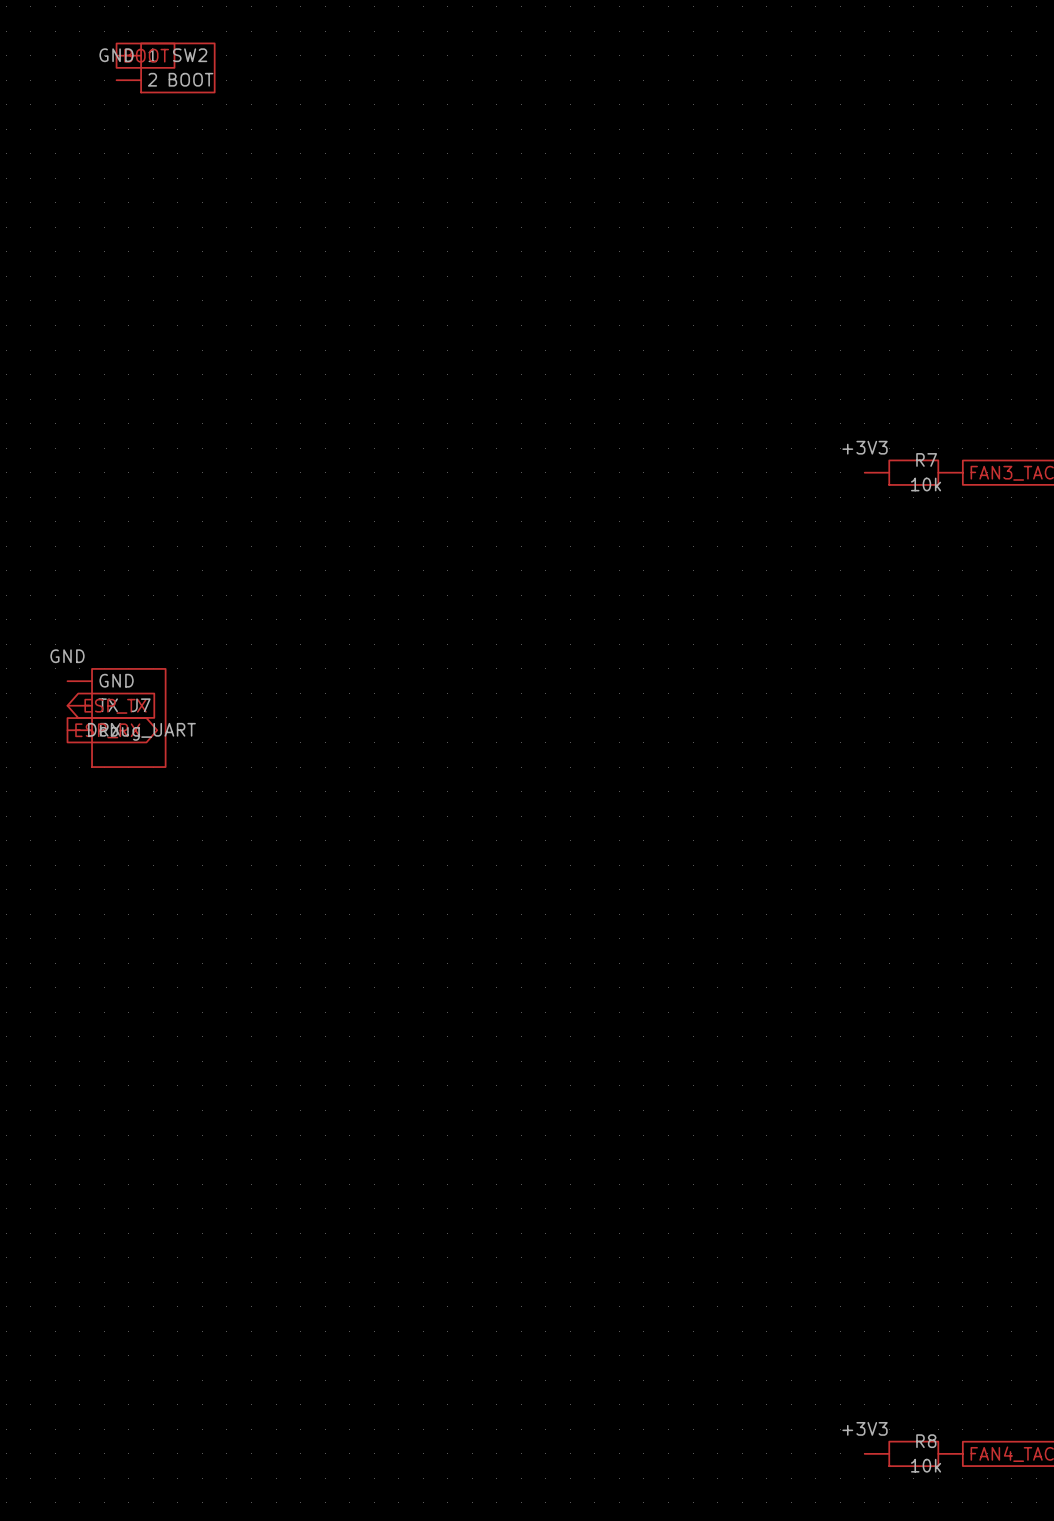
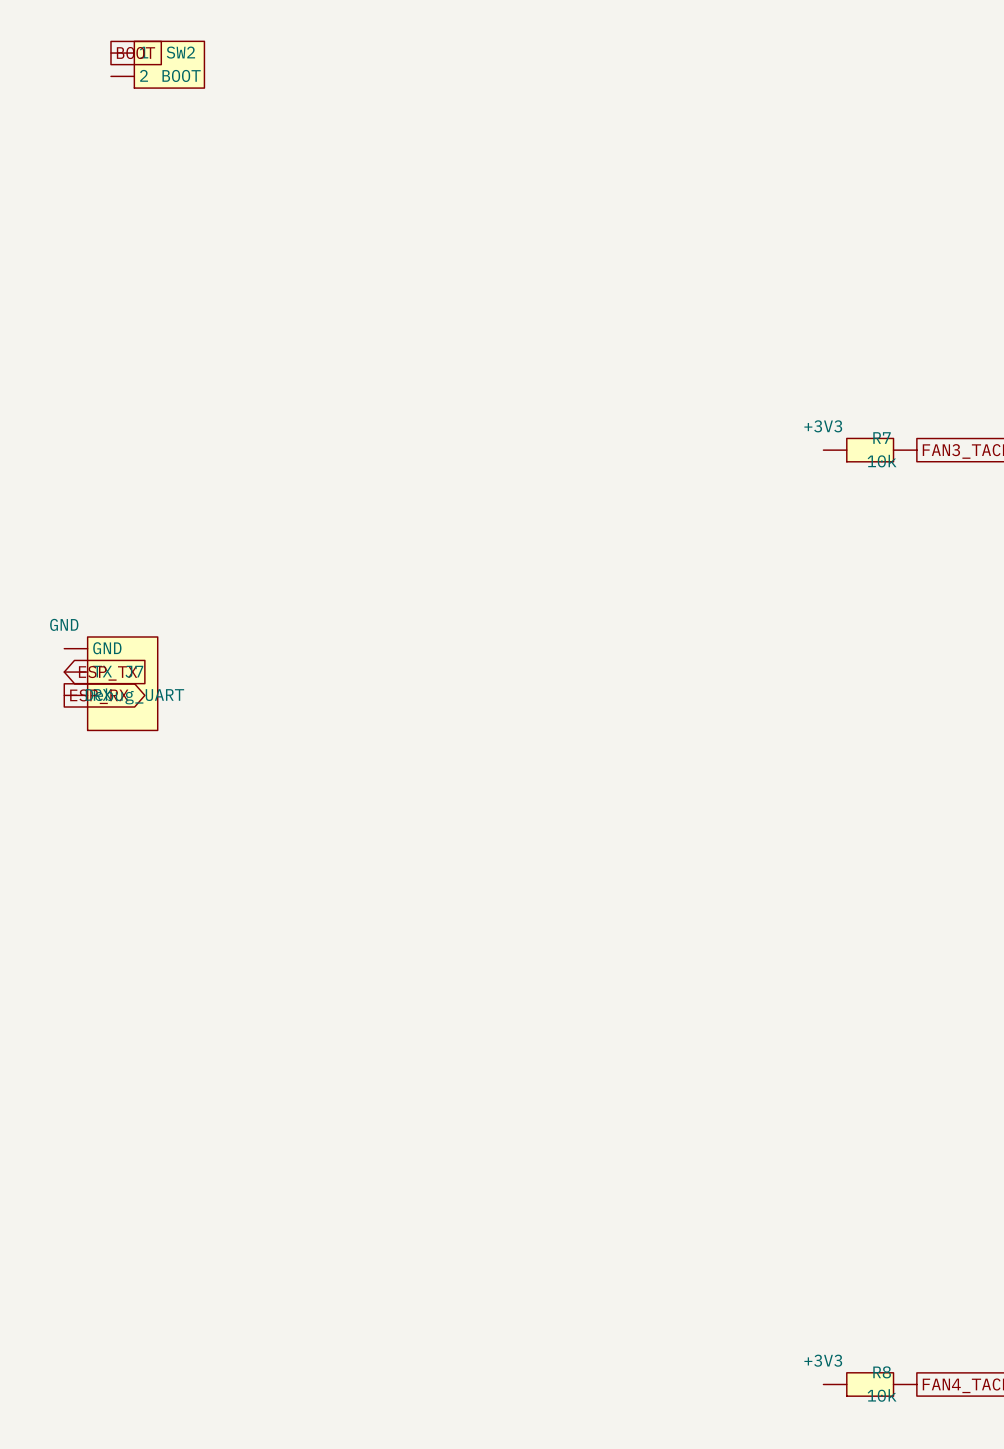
power symbol: GND (116, 55) -> none

